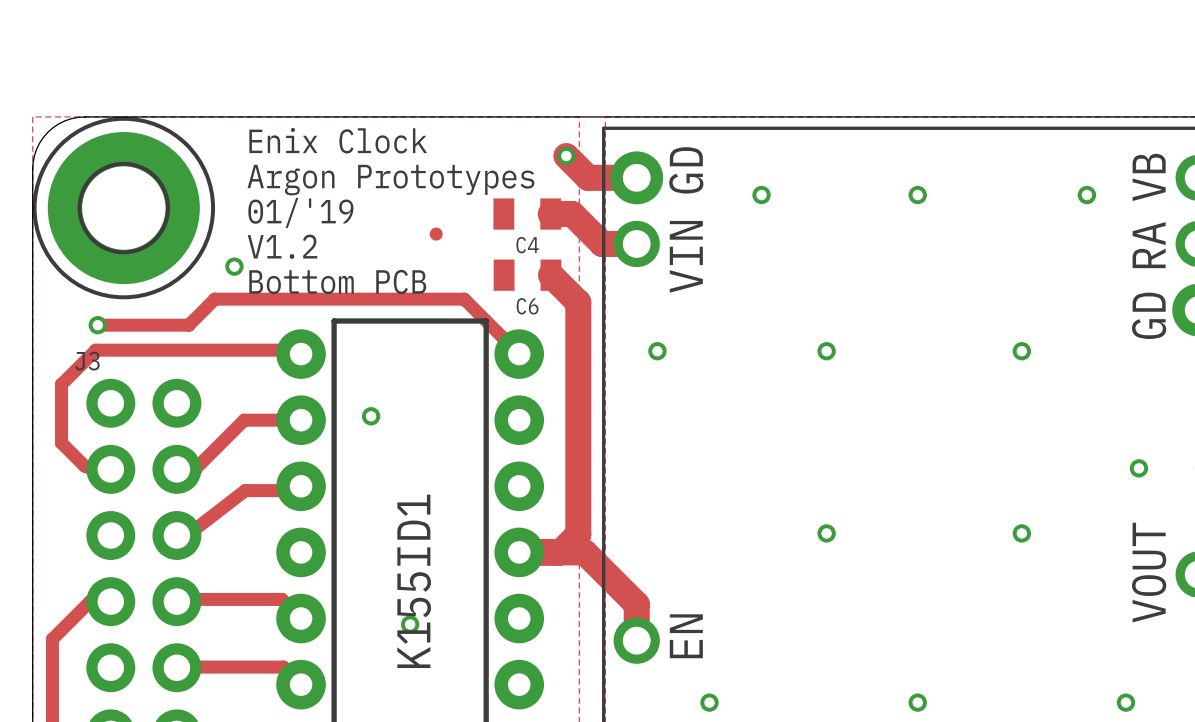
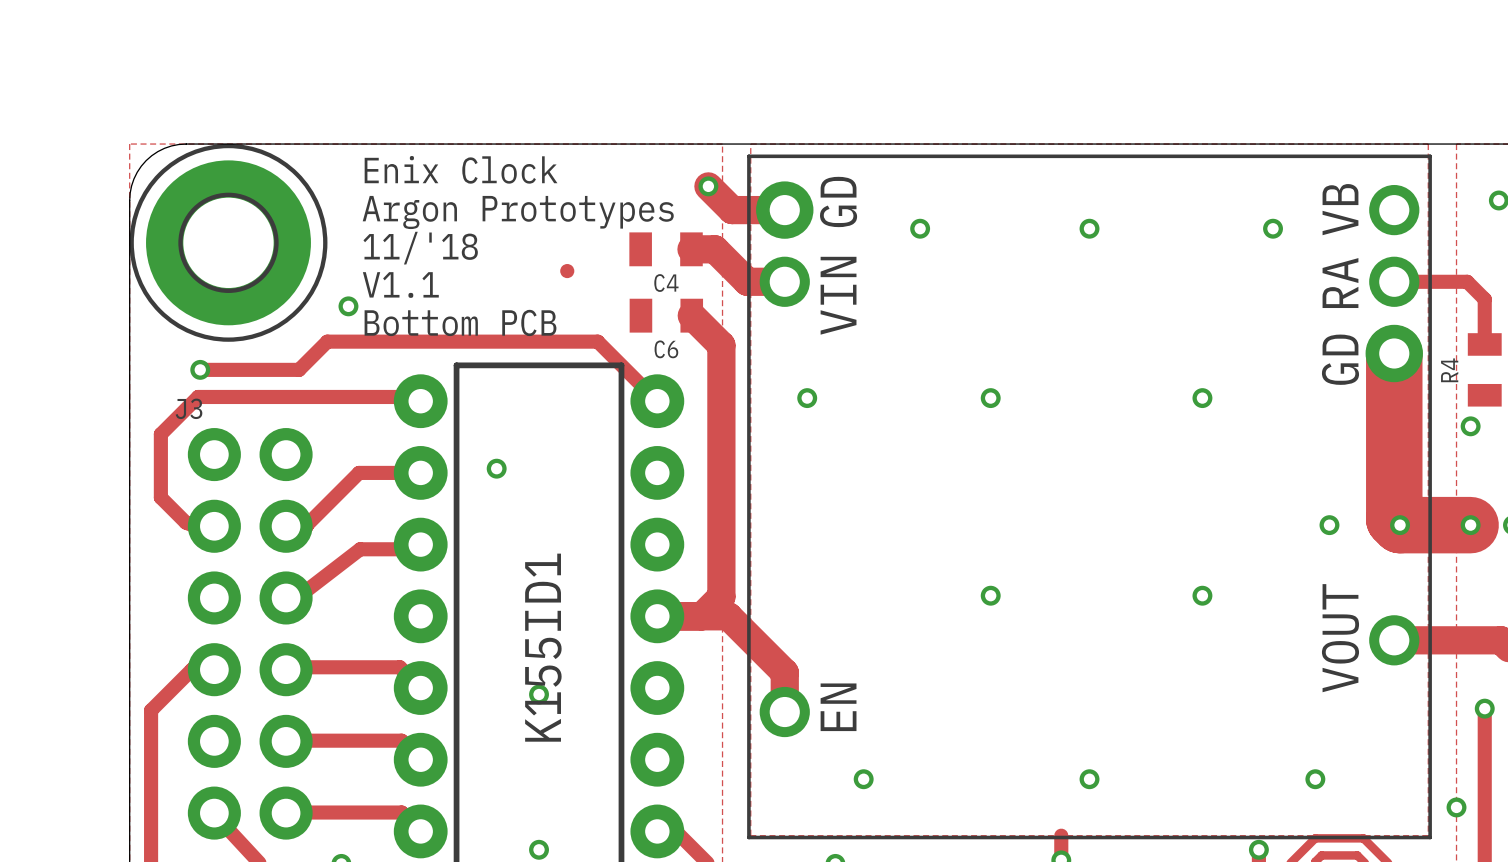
text: 01/'19 (300, 212) -> 11/'18 (420, 248)
text: V1.2 (282, 246) -> V1.1 (400, 285)

